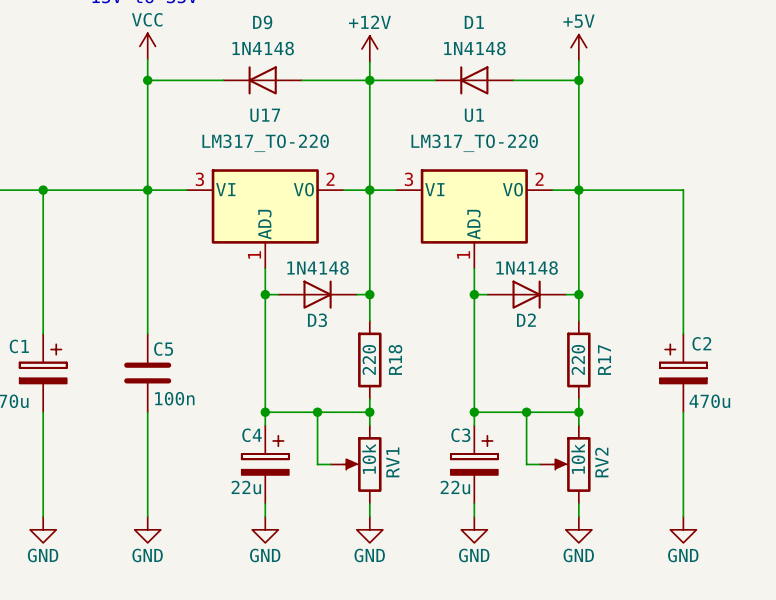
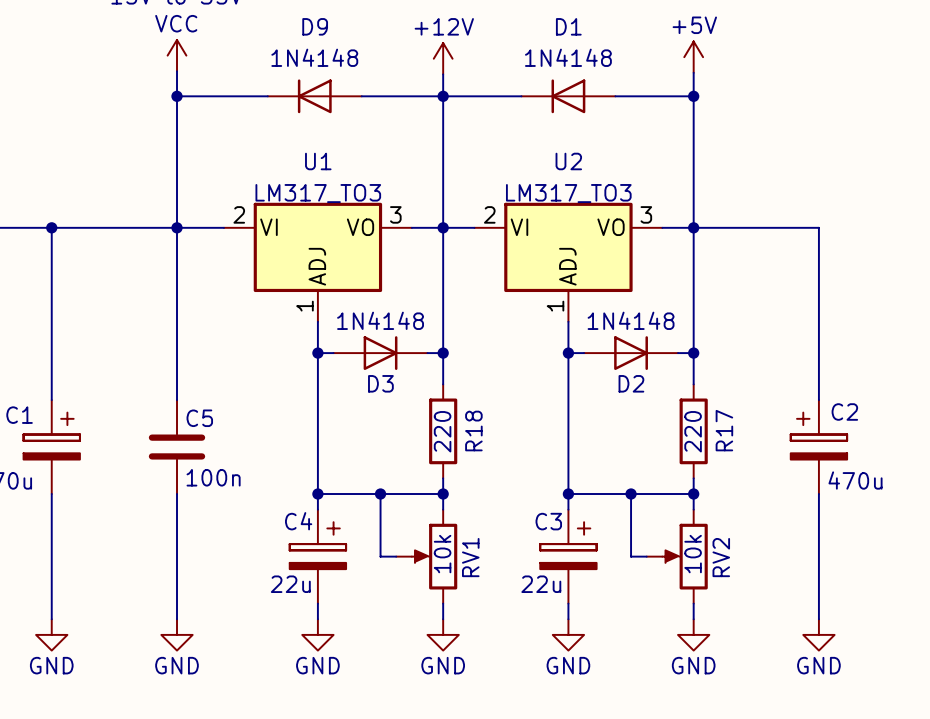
U1 name position: U1 (474, 115) -> U1 (318, 161)
U1 value: LM317_TO-220 (474, 143) -> LM317_TO3 (318, 193)
U1 pin number: 3 (408, 179) -> 2 (239, 214)
U1 pin number: 2 (539, 179) -> 3 (395, 214)
U17: LM317_TO-220 (265, 218) -> none
U1 position: (474, 218) -> (317, 262)
U2: none -> LM317_TO3 (568, 262)

